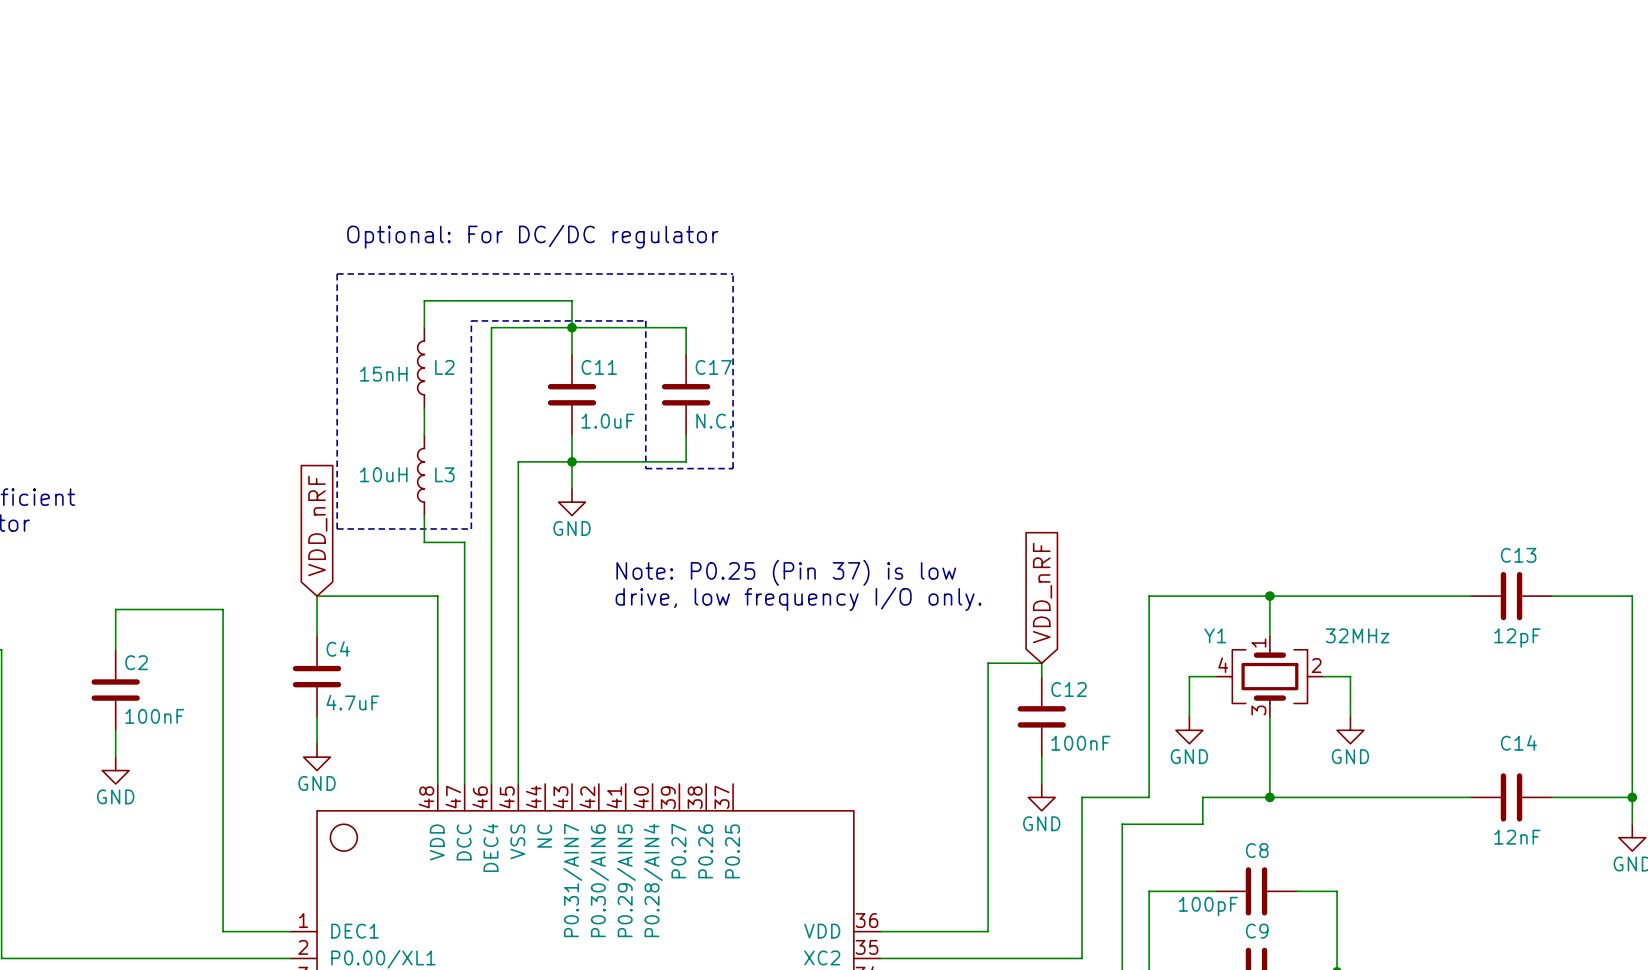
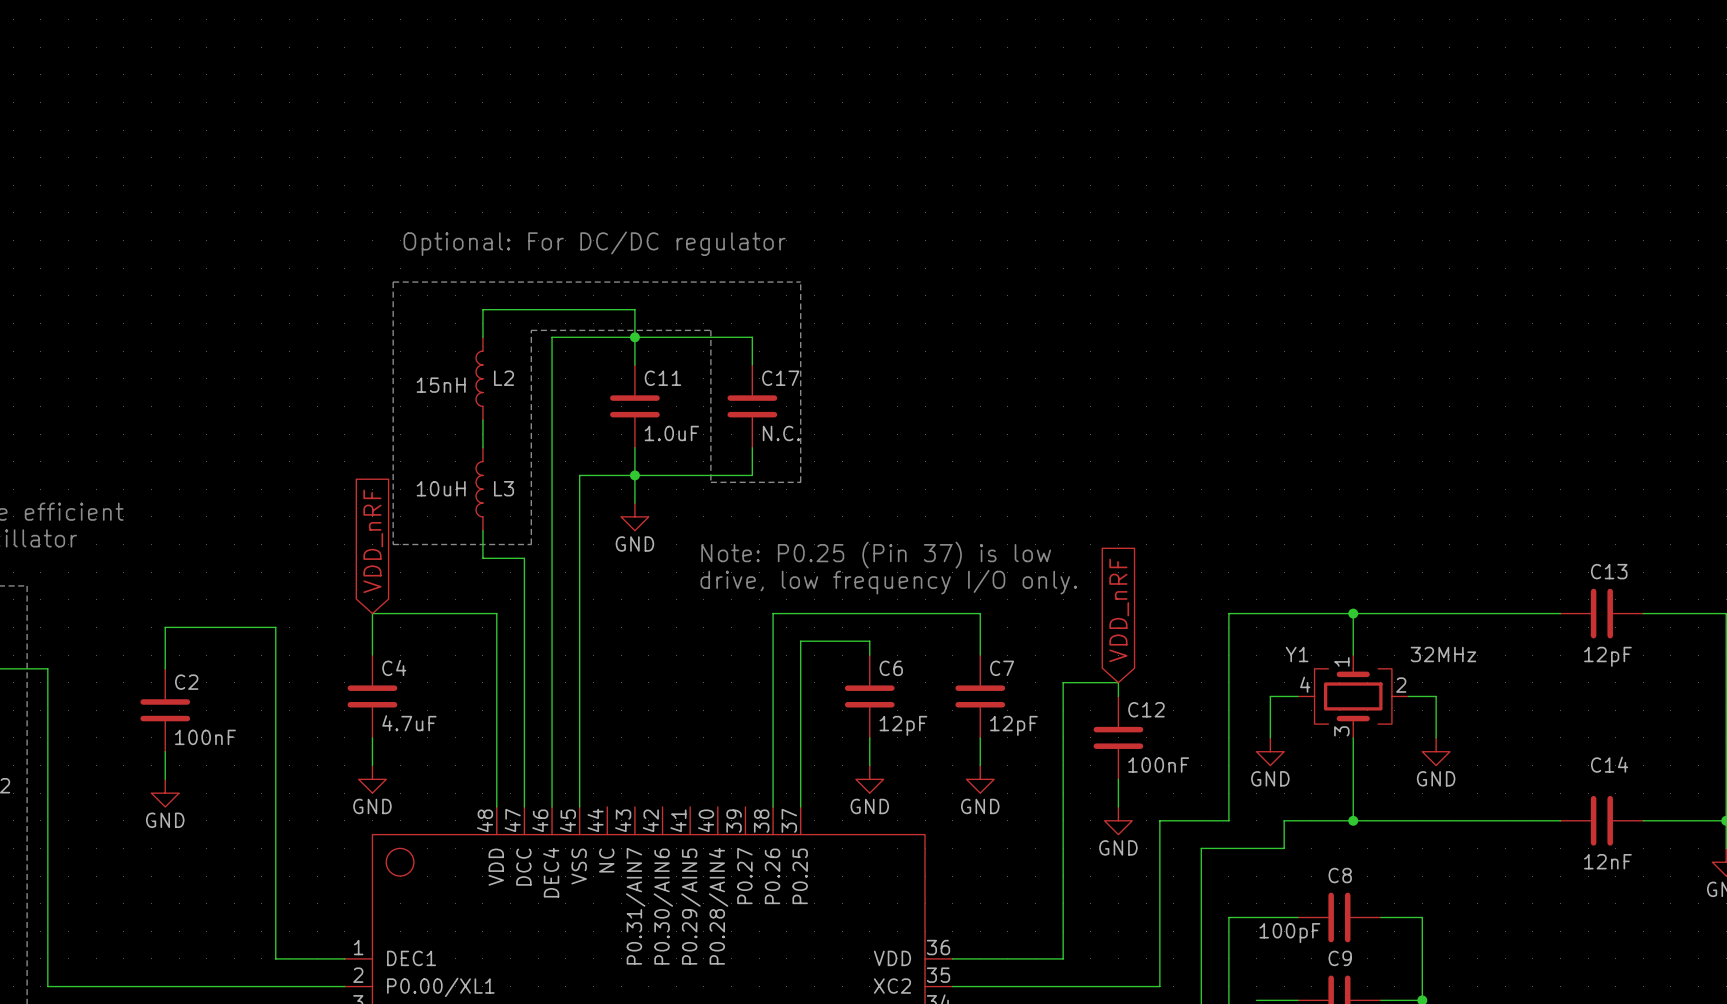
text position: Note: P0.25 (Pin 37) is low (786, 572) -> Note: P0.25 (Pin 37) is low (876, 555)
text position: drive, low frequency I/O only. (798, 599) -> drive, low frequency I/O only. (888, 582)
wire: none -> (869, 655) (869, 641) (800, 641) (800, 806)
wire: none -> (980, 655) (980, 613) (773, 613) (773, 806)
C6: none -> 12pF (869, 696)
C7: none -> 12pF (980, 696)
wire: none -> (869, 737) (869, 765)
wire: none -> (980, 737) (980, 765)
power symbol: none -> GND (869, 779)
power symbol: none -> GND (980, 779)

